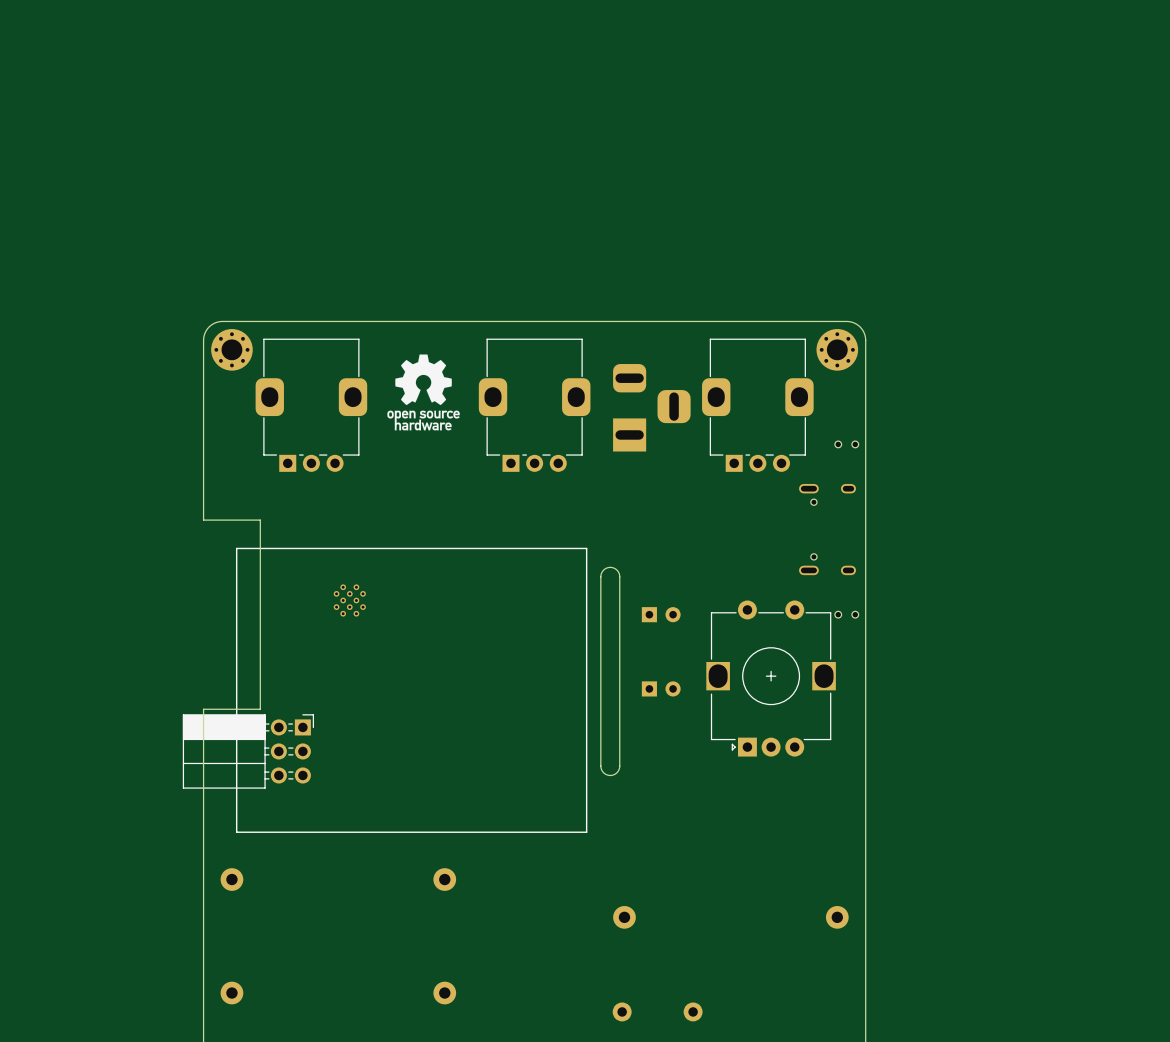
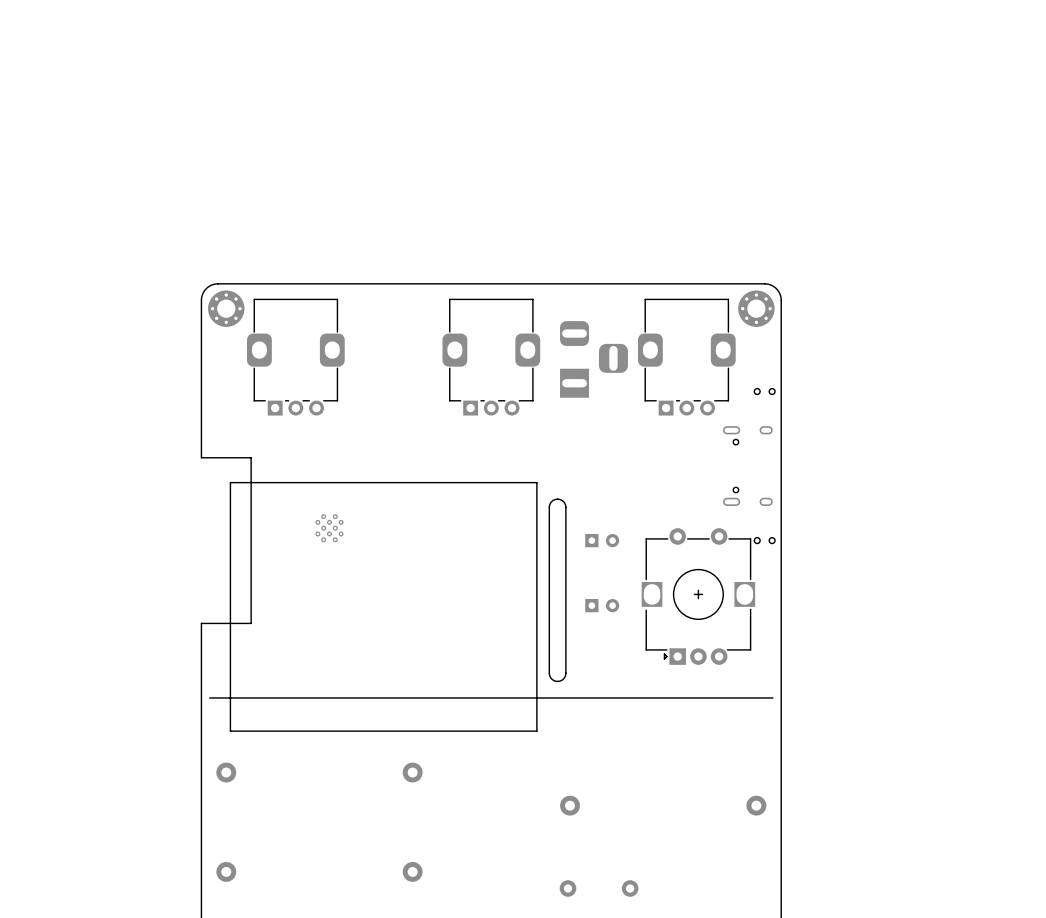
drawing: [387, 354, 460, 431] -> none
part: (248, 751) -> none
line: none -> (209, 697) (772, 697)

